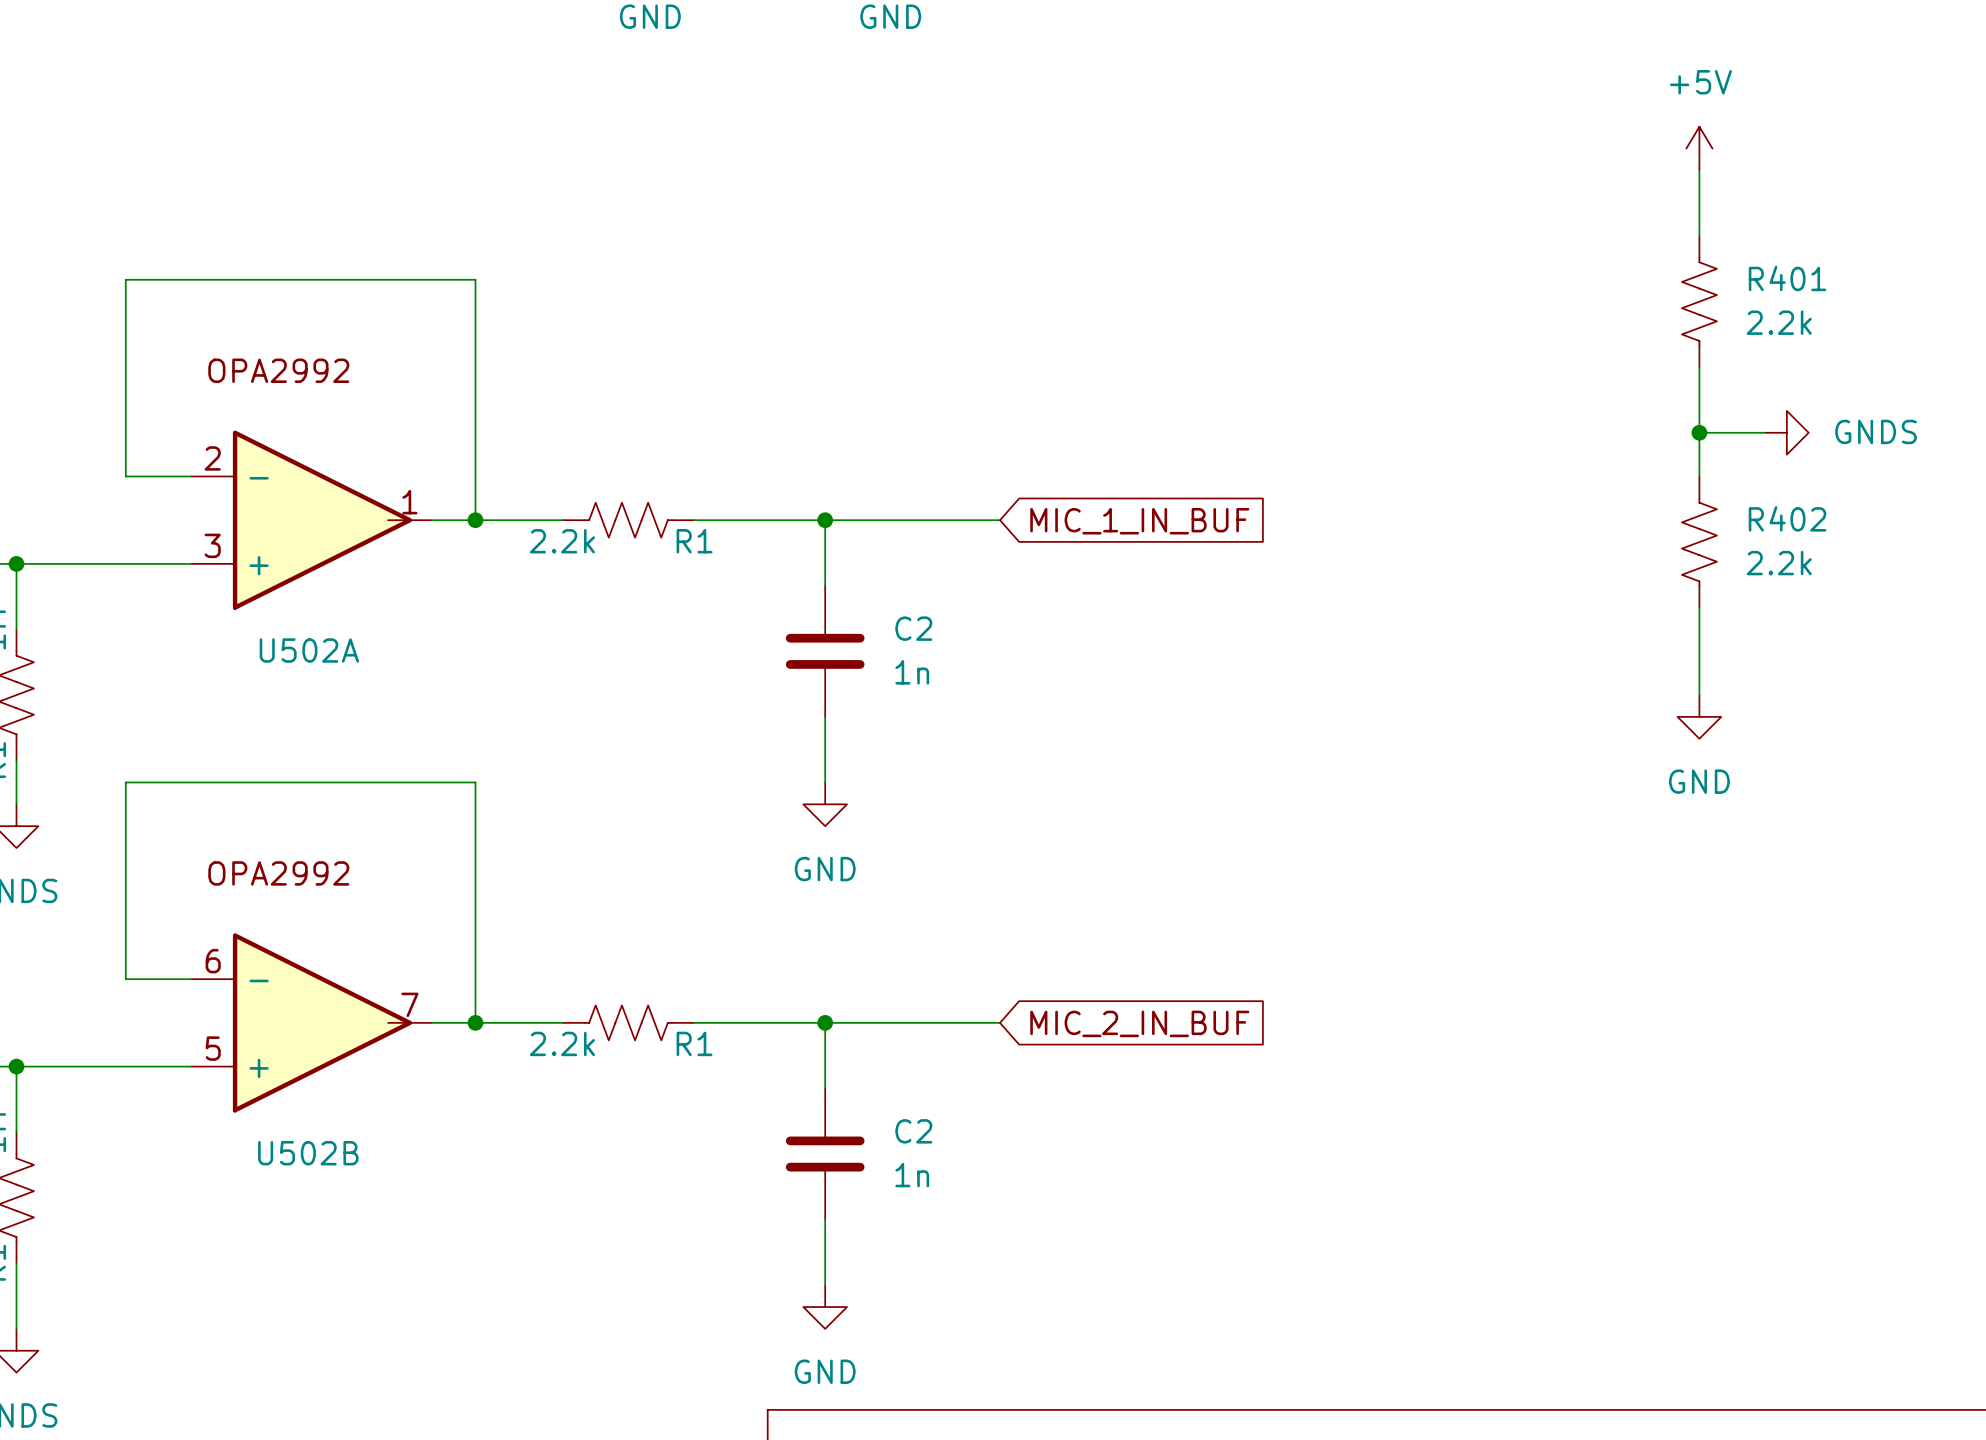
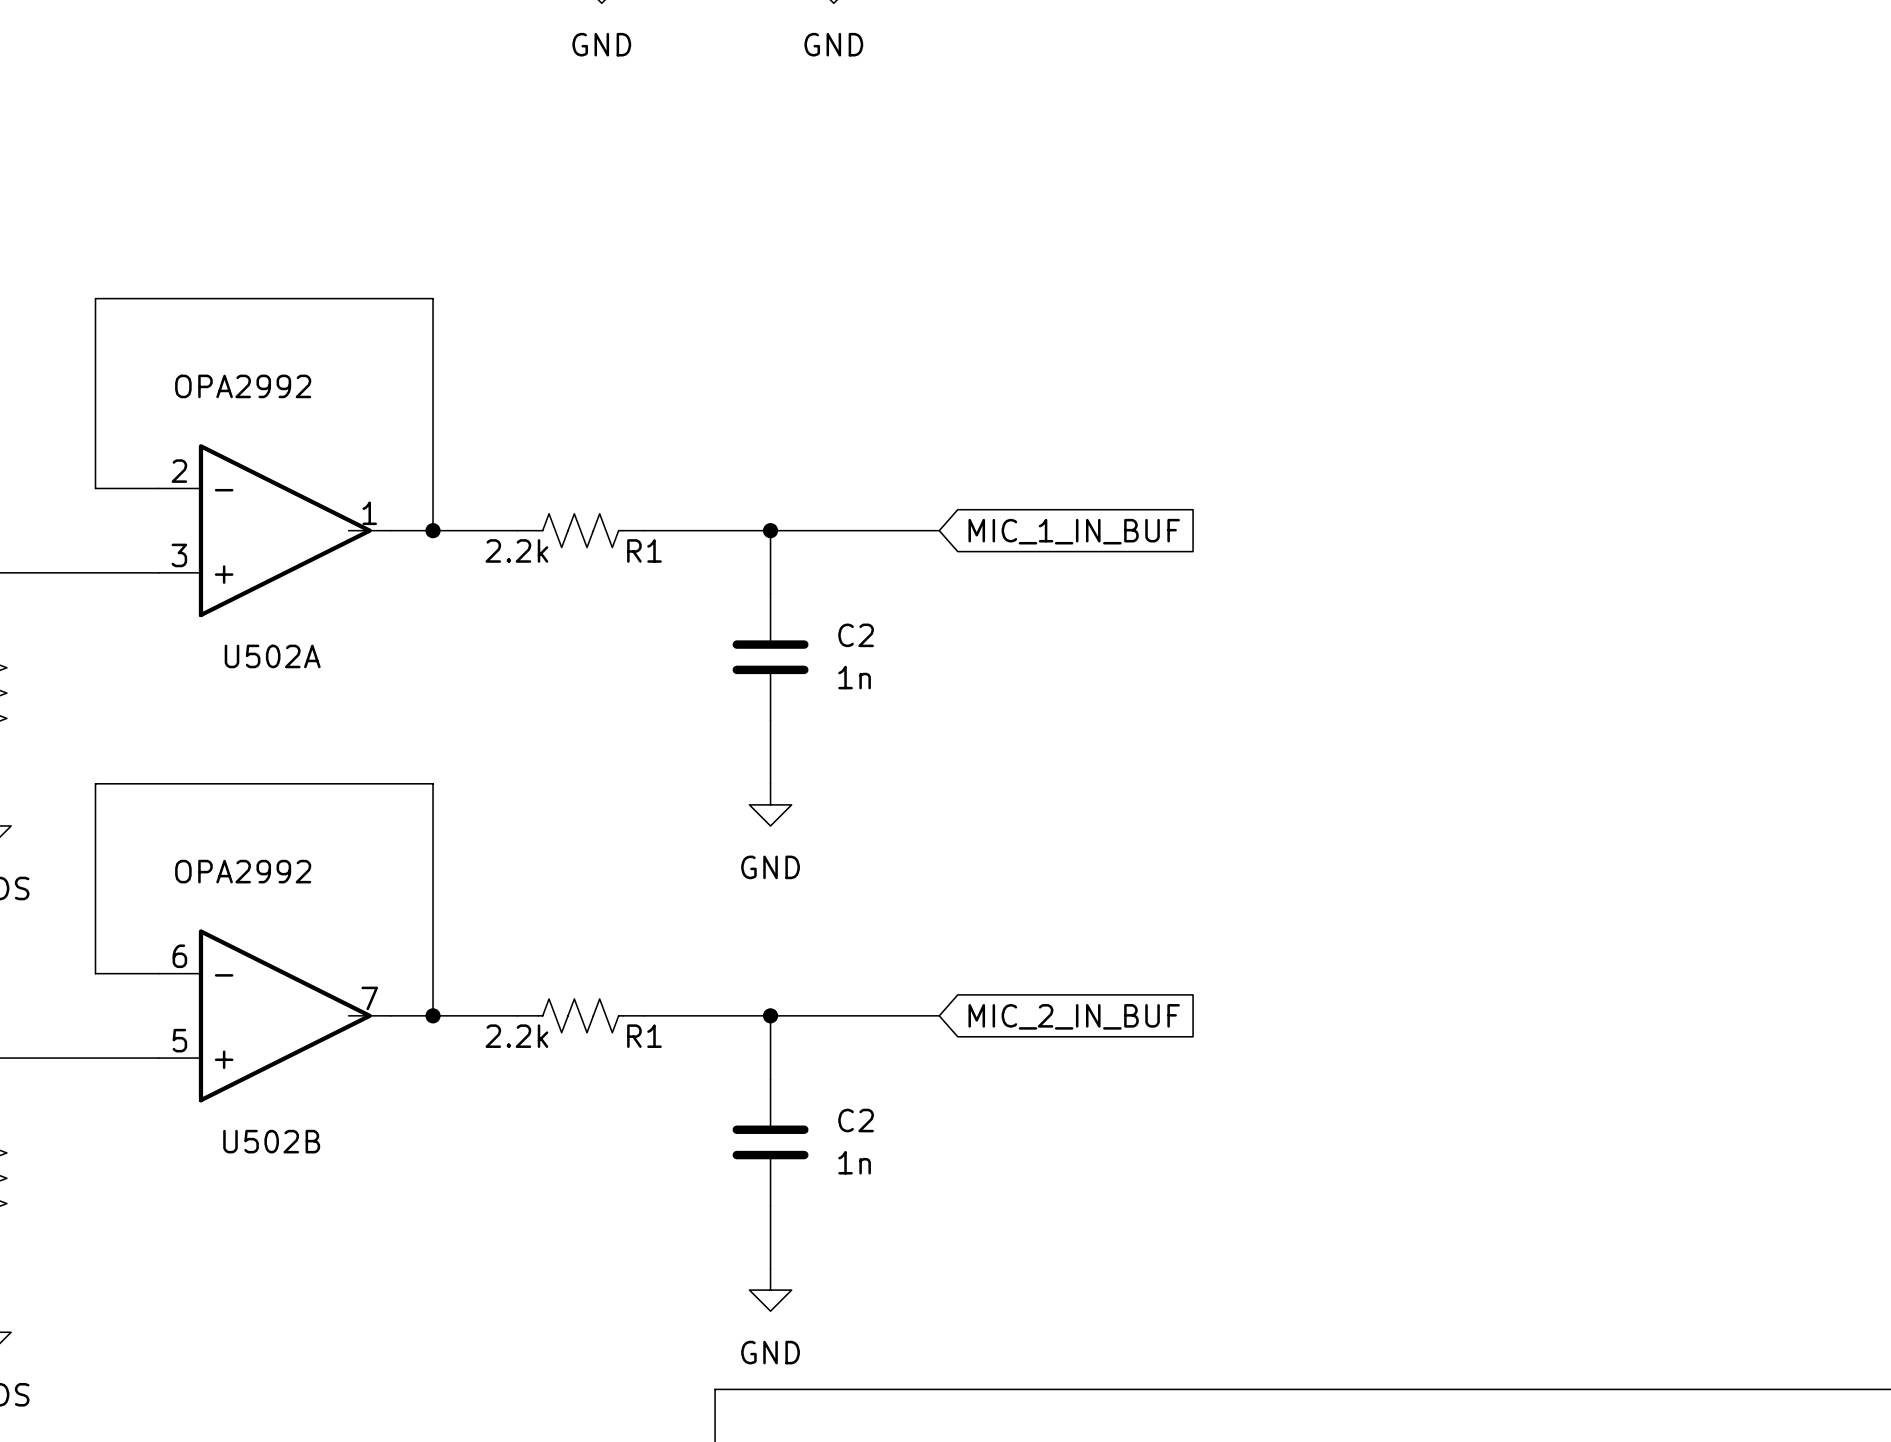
power symbol: +5V (1699, 148) -> none
wire: (1699, 170) (1699, 236) -> none
R401: 2.2k (1699, 301) -> none
wire: (1699, 367) (1699, 476) -> none
wire: (1699, 432) (1765, 432) -> none
junction: (1699, 432) -> none
power symbol: GNDS (1786, 432) -> none
R402: 2.2k (1699, 542) -> none
wire: (1699, 607) (1699, 695) -> none
power symbol: GND (1699, 716) -> none

